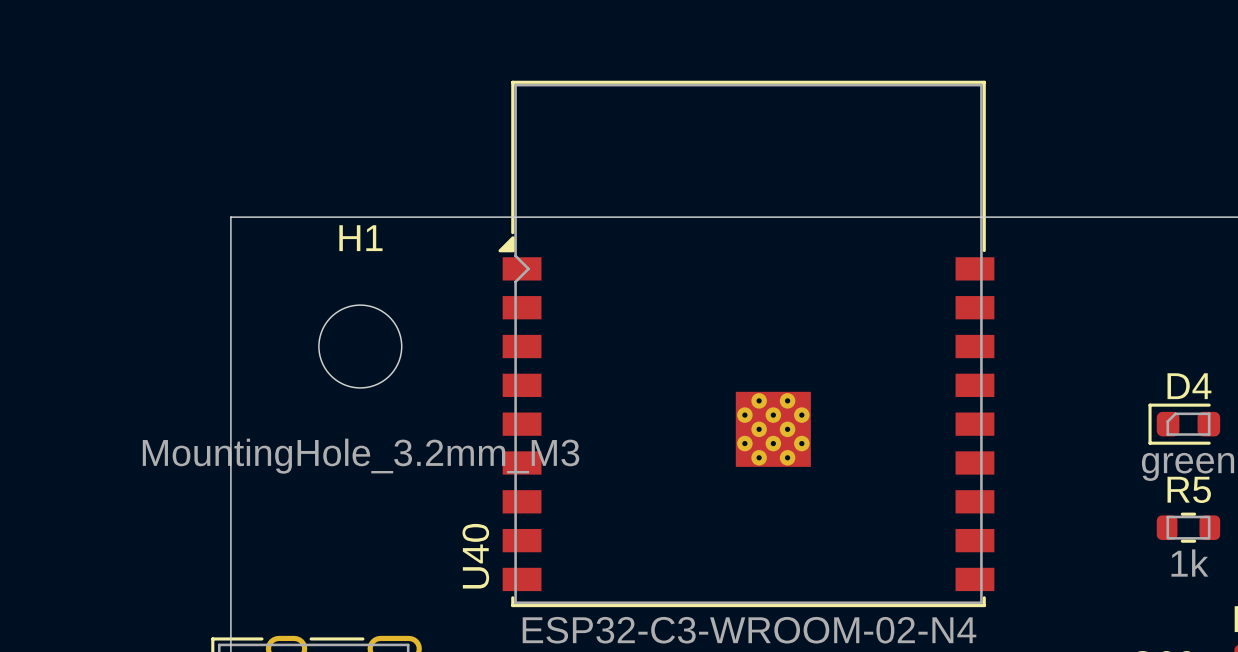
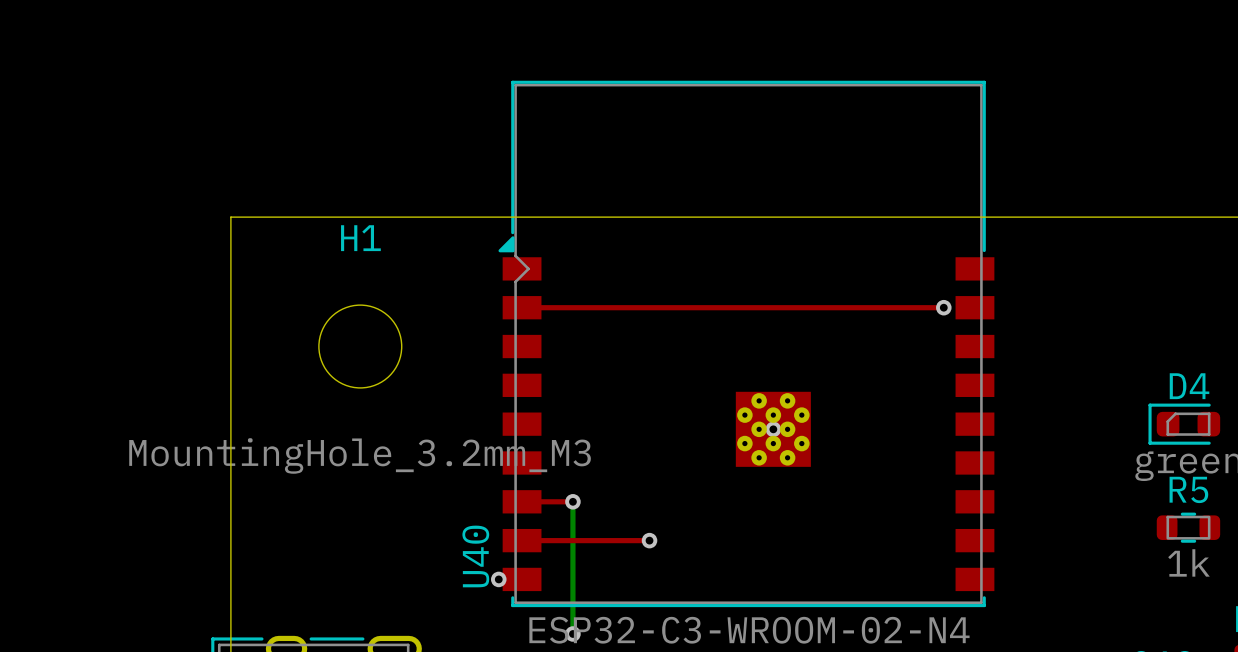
top track: none -> (522, 307) (943, 307)
via: none -> (943, 307)
via: none -> (773, 429)
top track: none -> (522, 501) (572, 501)
bottom track: none -> (572, 501) (572, 633)
via: none -> (572, 501)
top track: none -> (522, 540) (649, 540)
via: none -> (649, 540)
via: none -> (498, 579)
via: none -> (572, 633)

